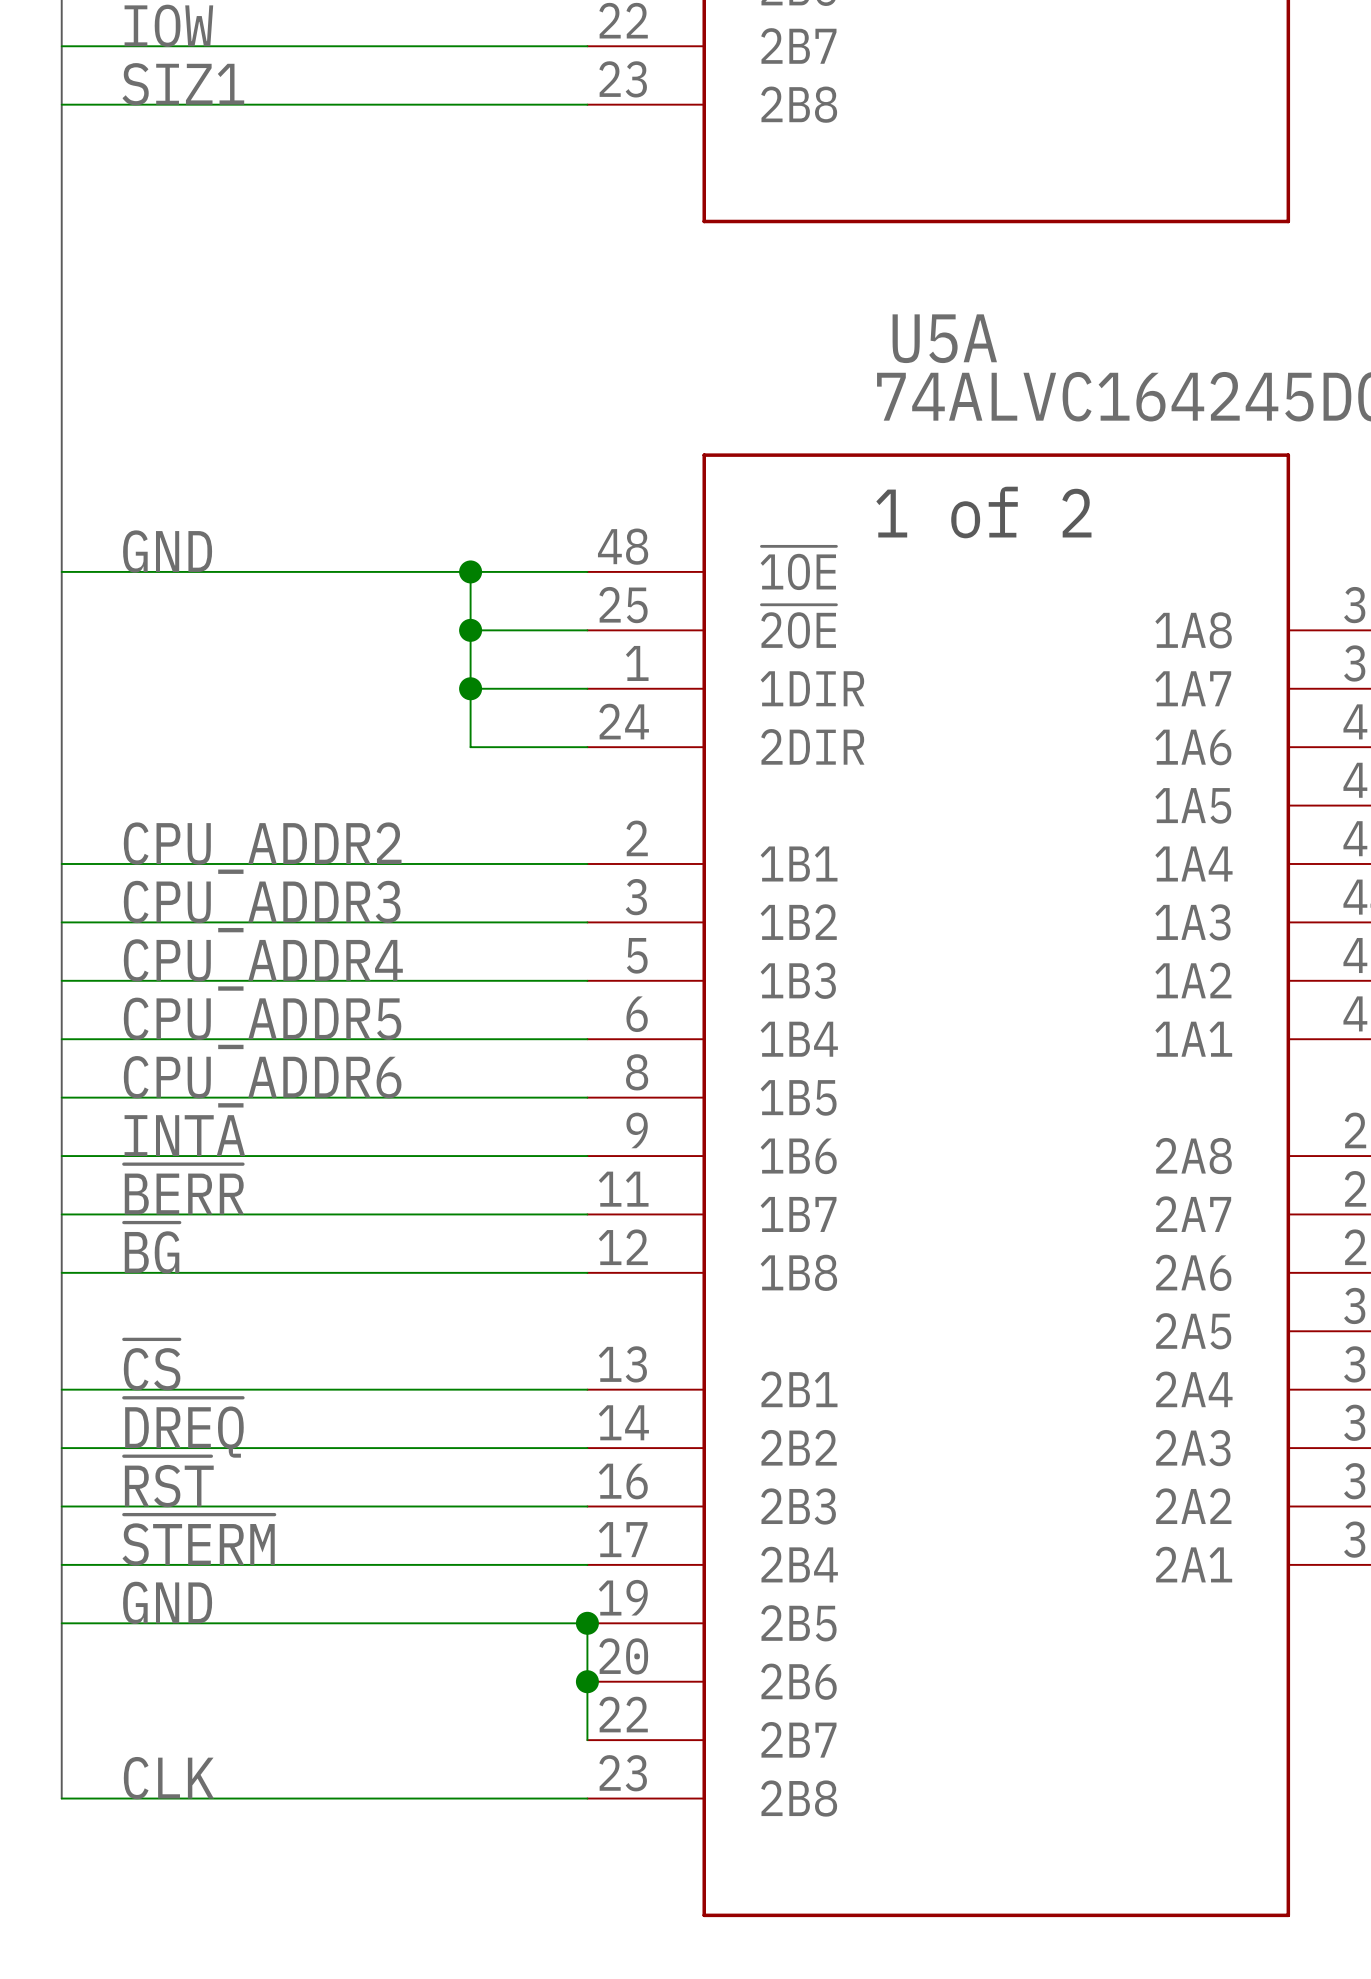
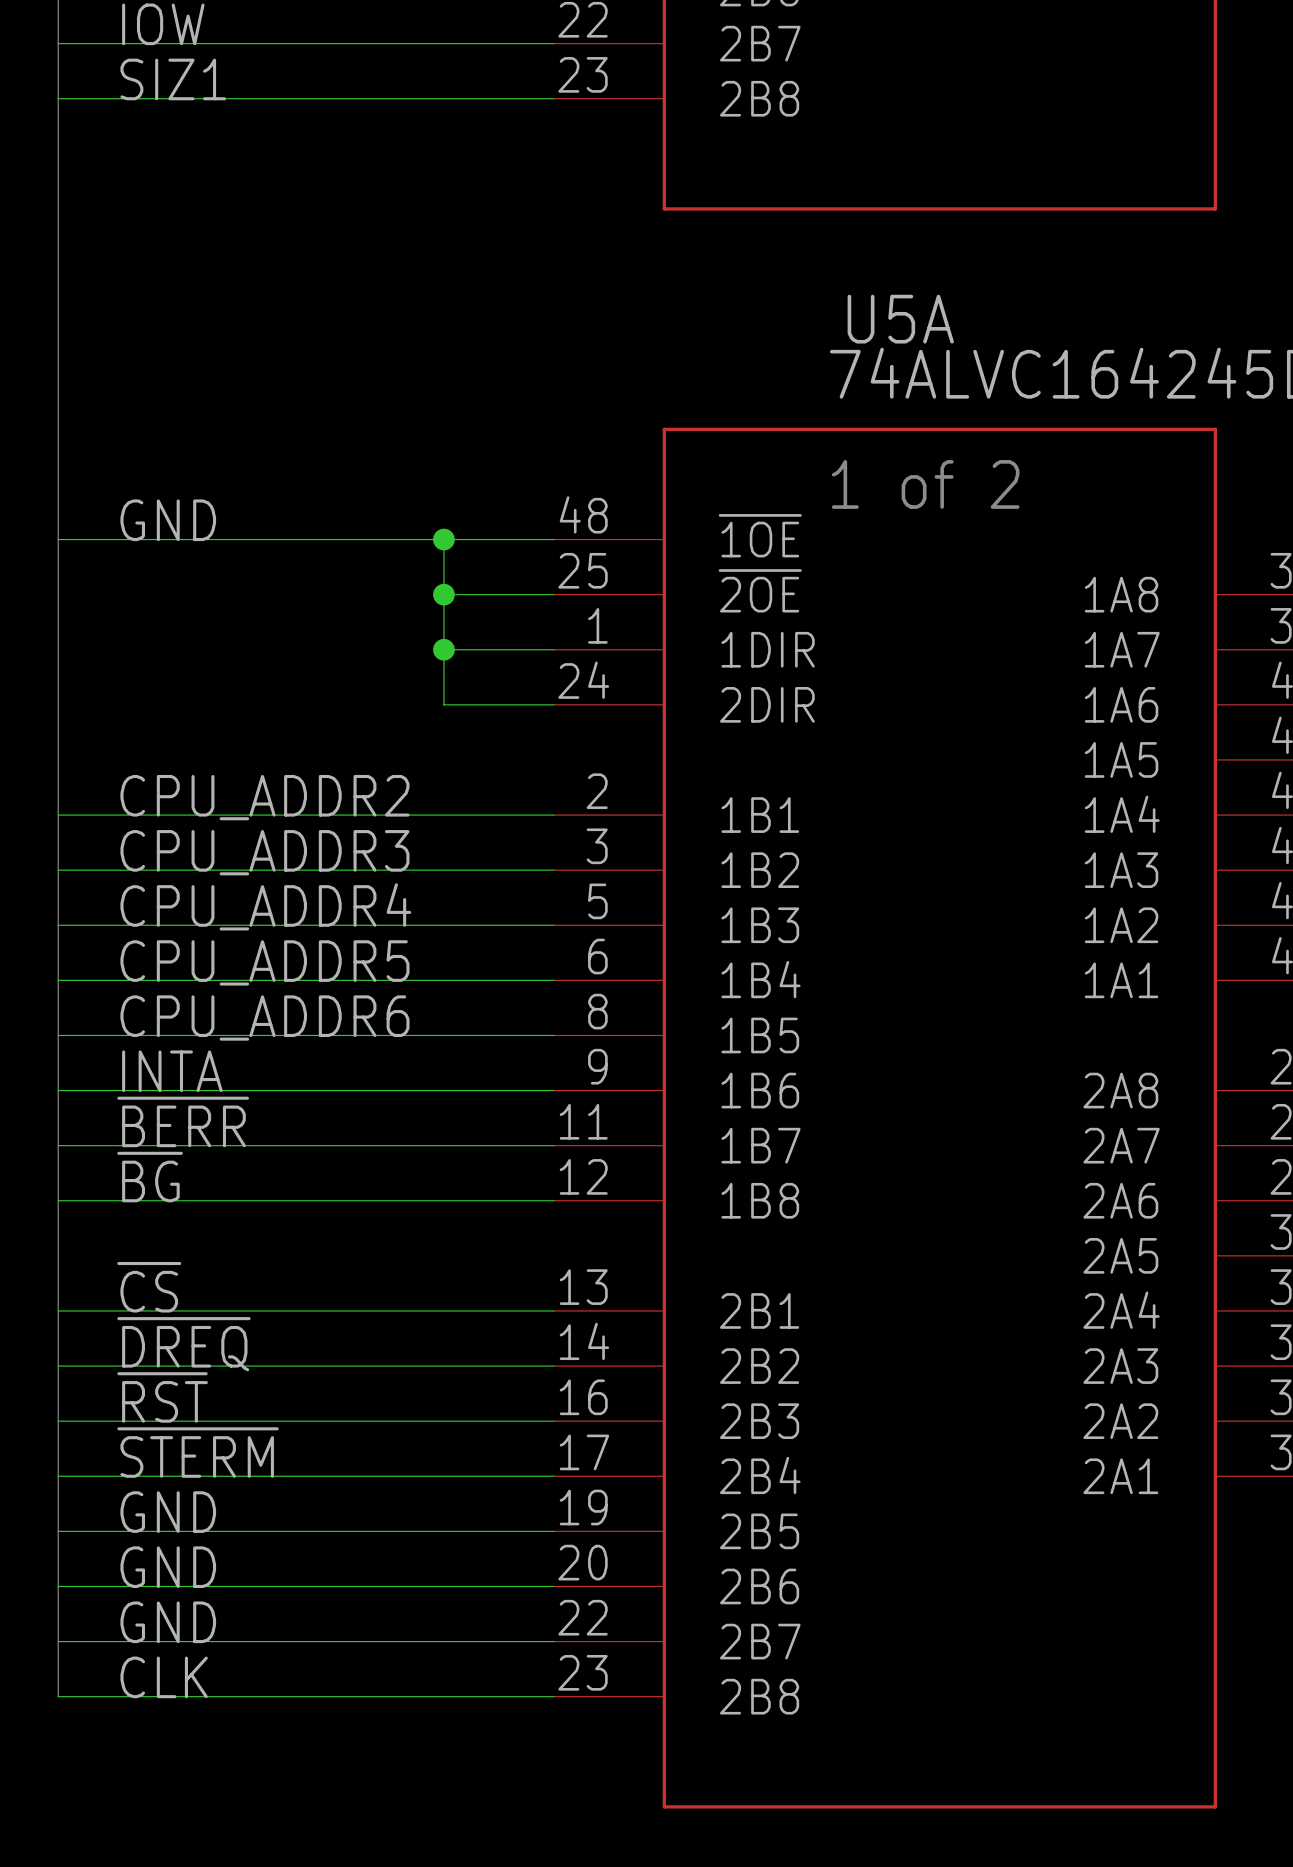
wire: (587, 1623) (587, 1740) -> (58, 1641) (554, 1641)
junction: (587, 1623) -> none
label: none -> GND (168, 1567)
wire: none -> (58, 1586) (554, 1586)
junction: (587, 1681) -> none
label: none -> GND (168, 1622)

